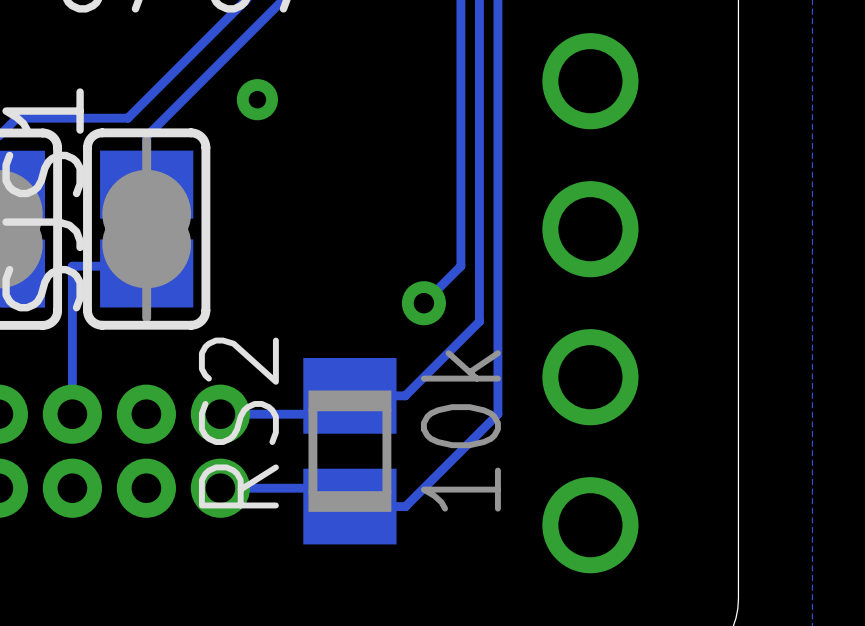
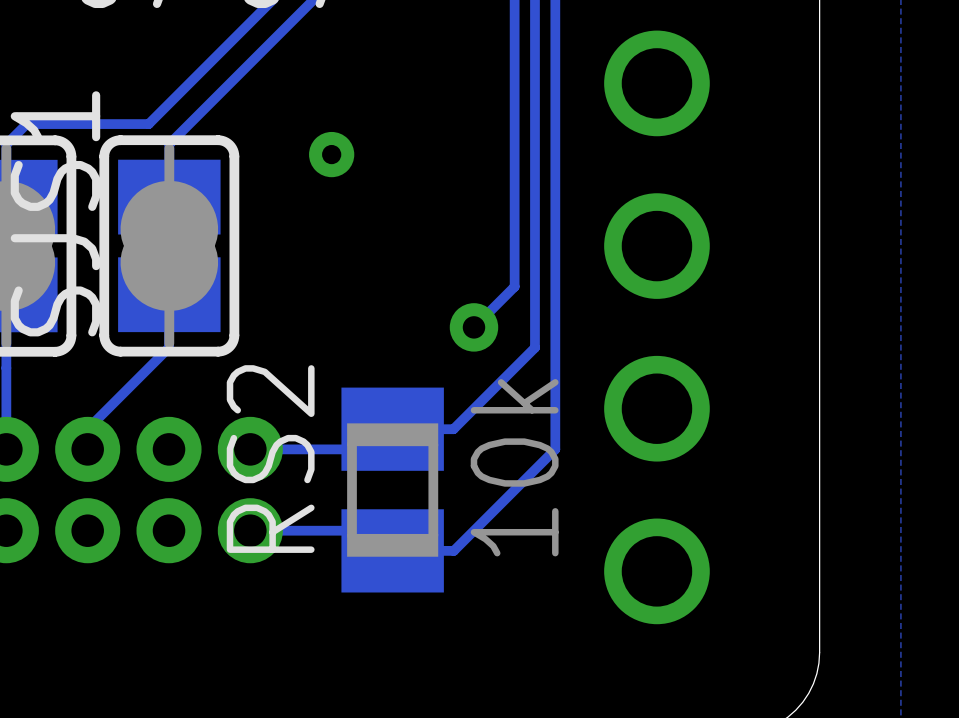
via position: (257, 99) -> (331, 154)
track: (146, 273) (129, 255) (118, 266) (72, 266) (72, 395) -> (169, 294) (169, 347) (87, 429)

